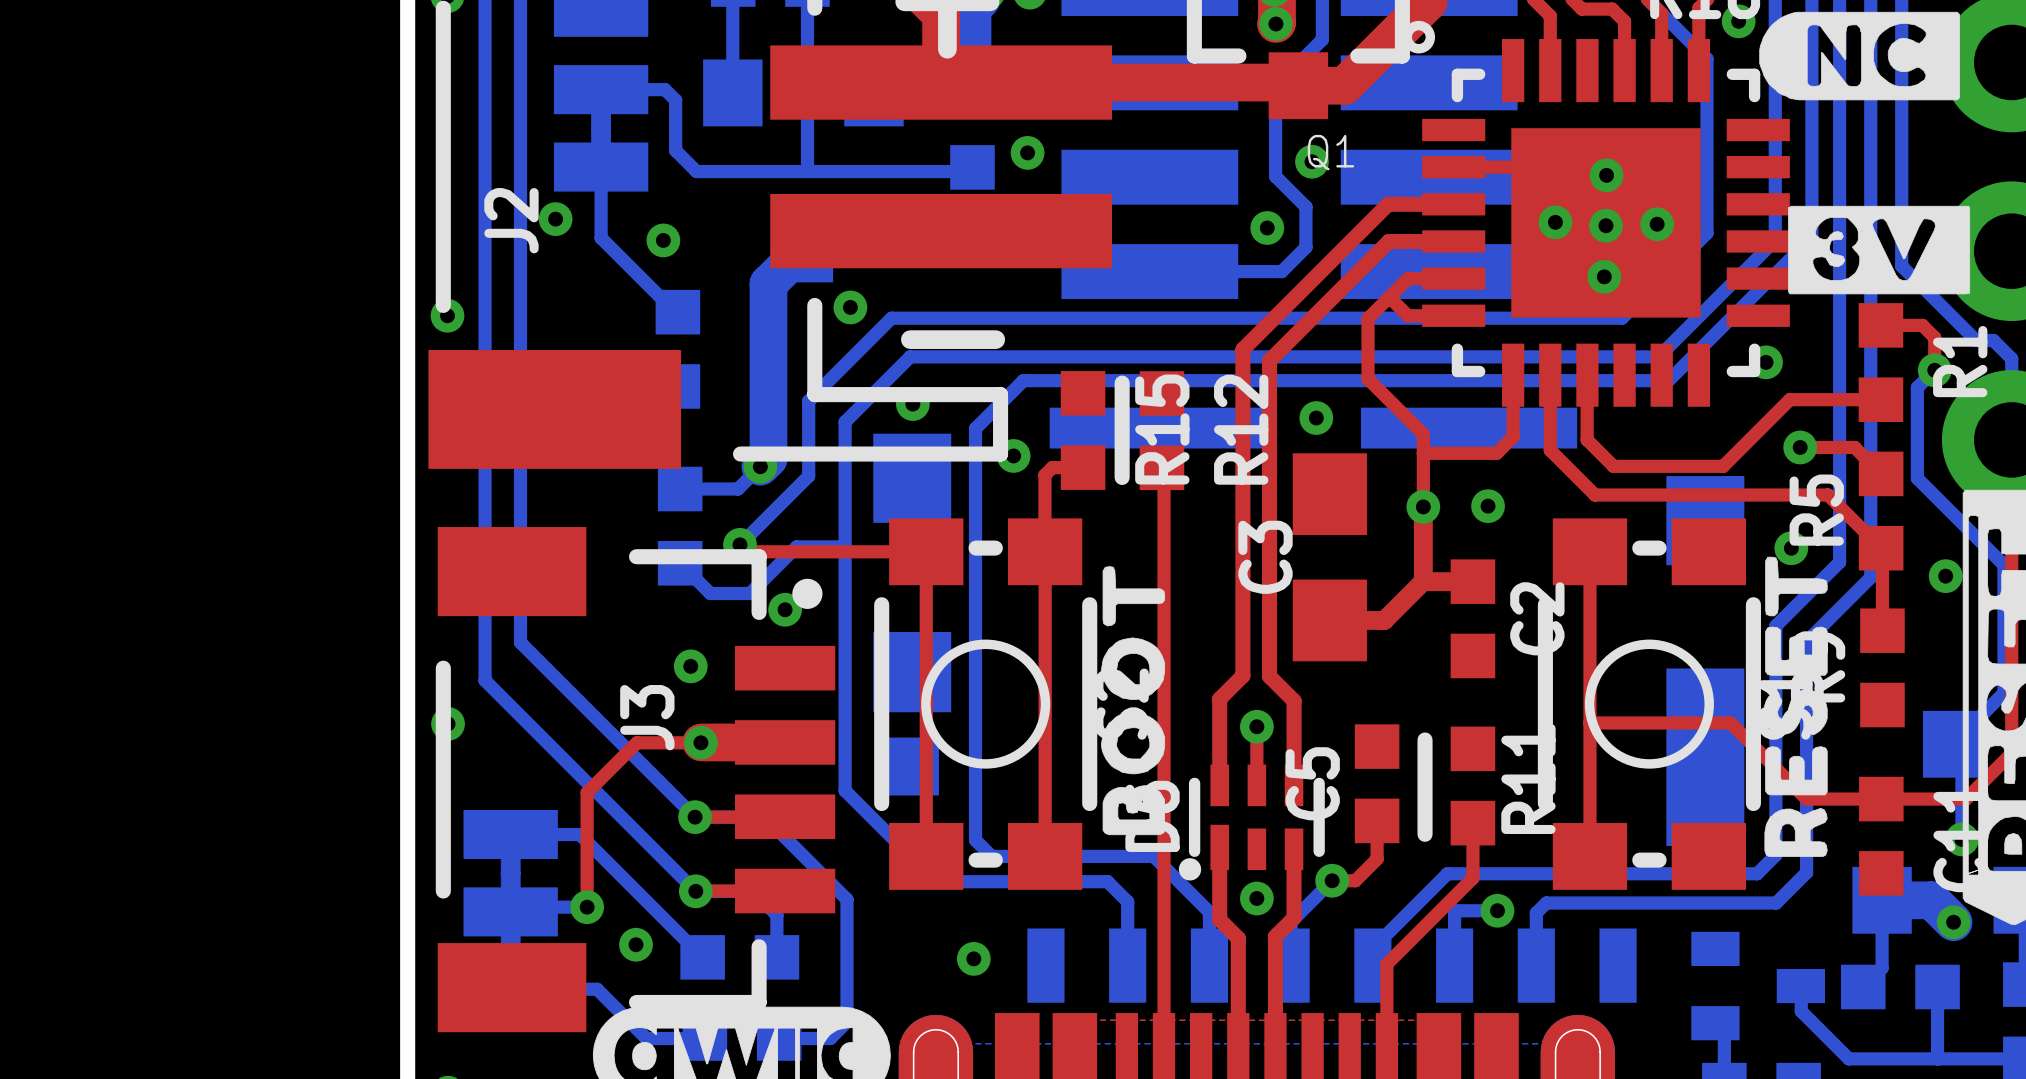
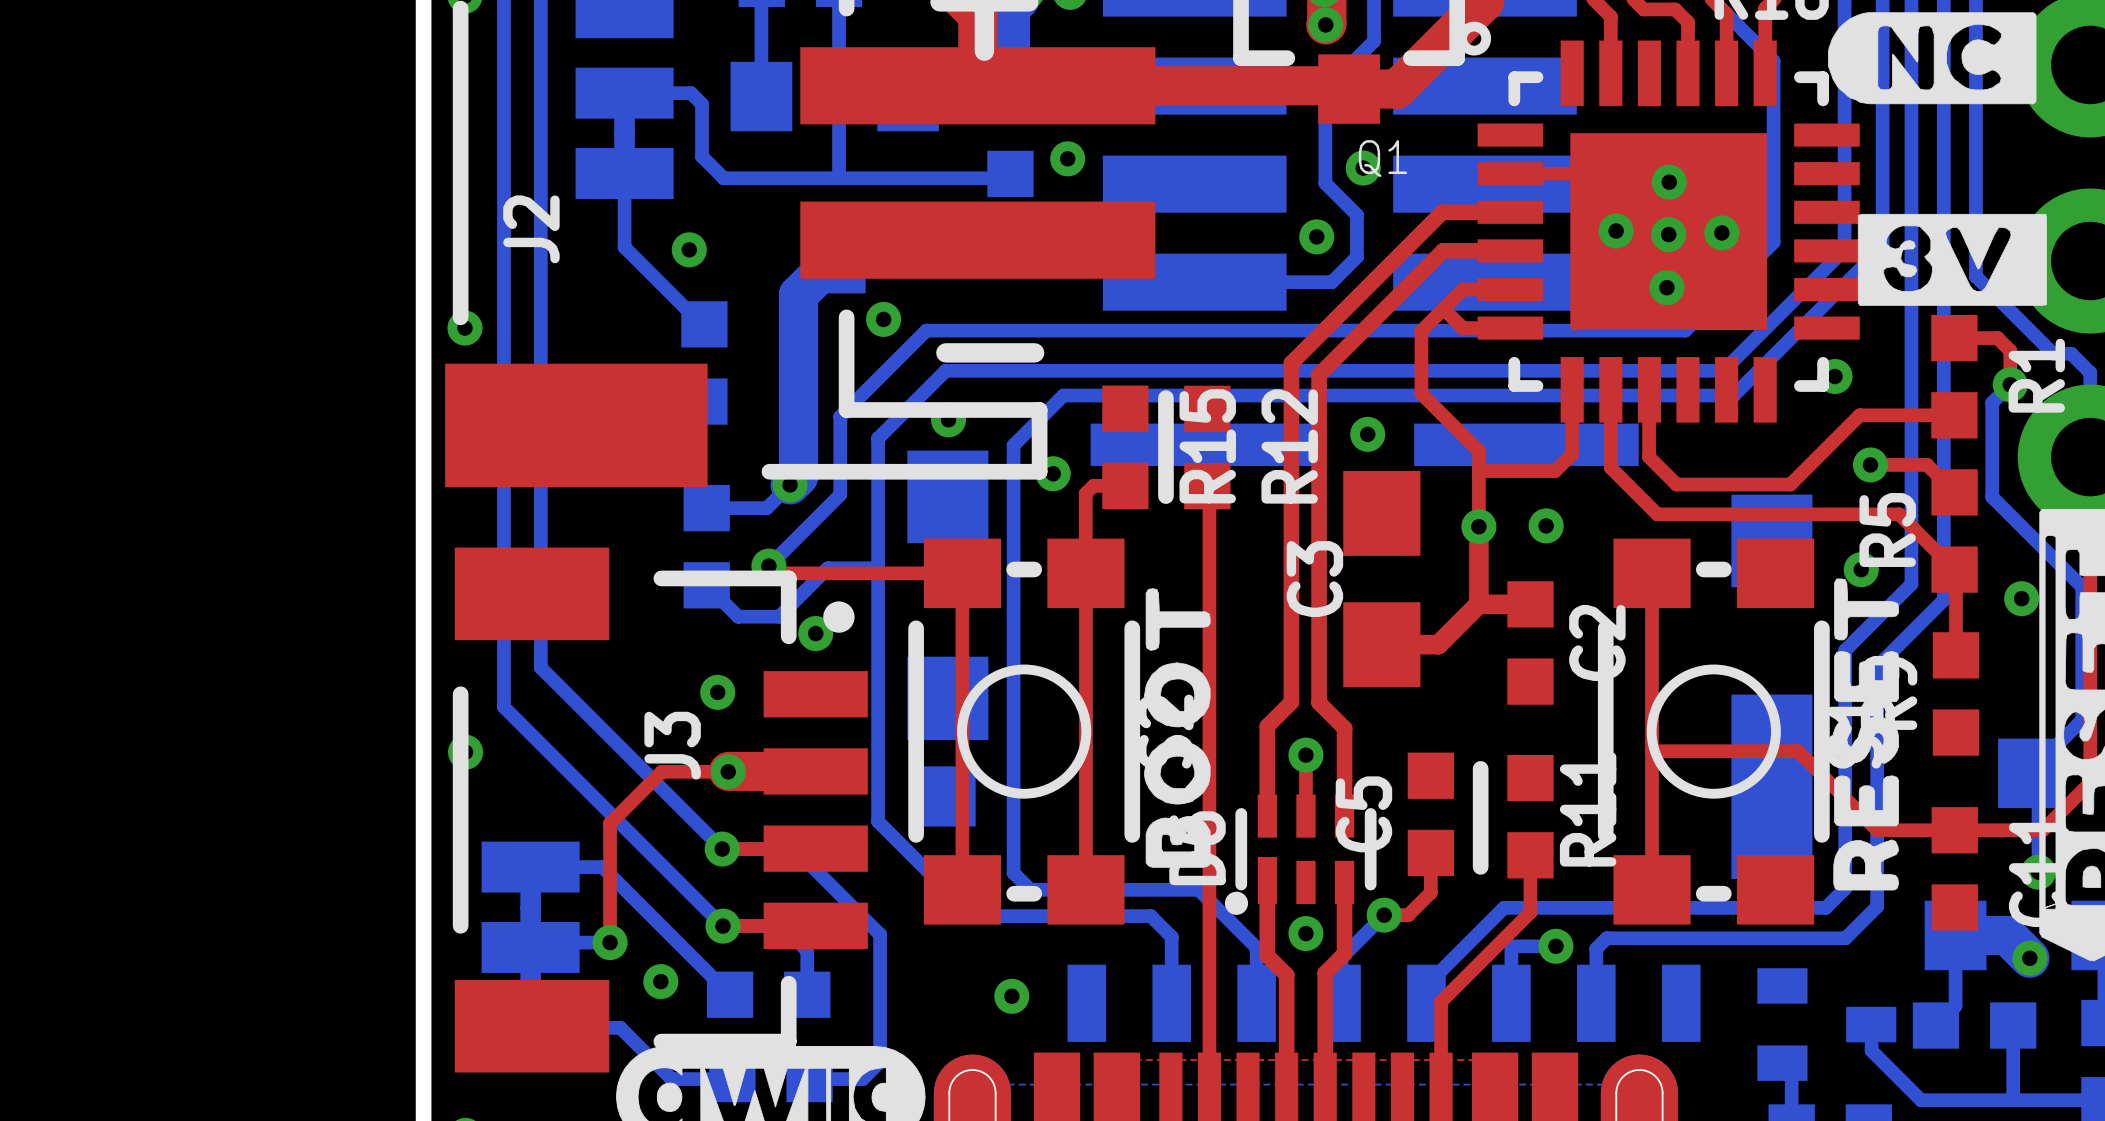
via: (1738, 21) -> none
via: (555, 219) -> none

